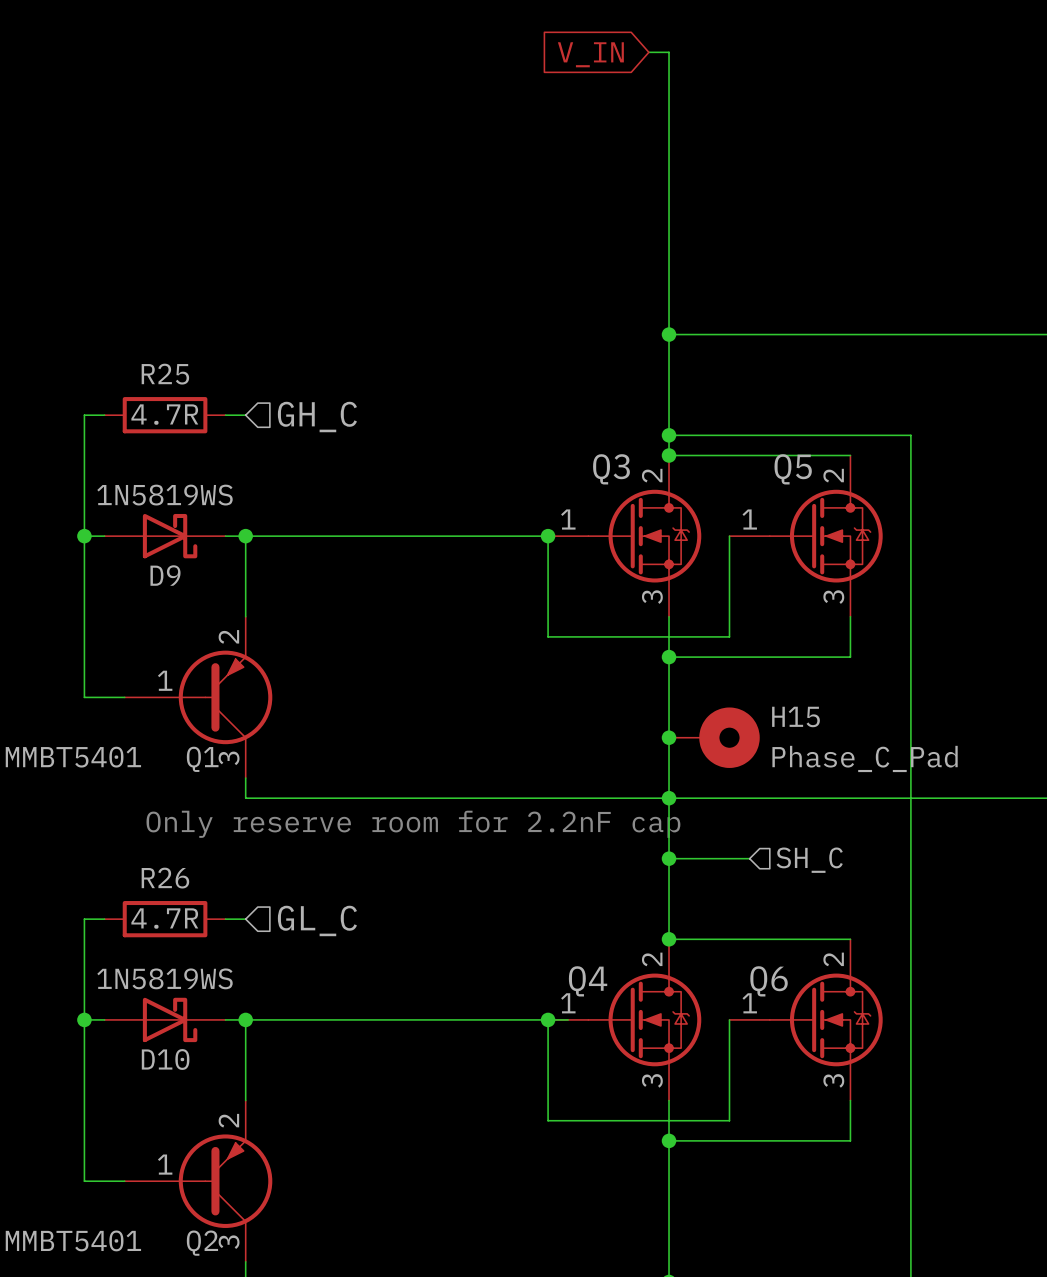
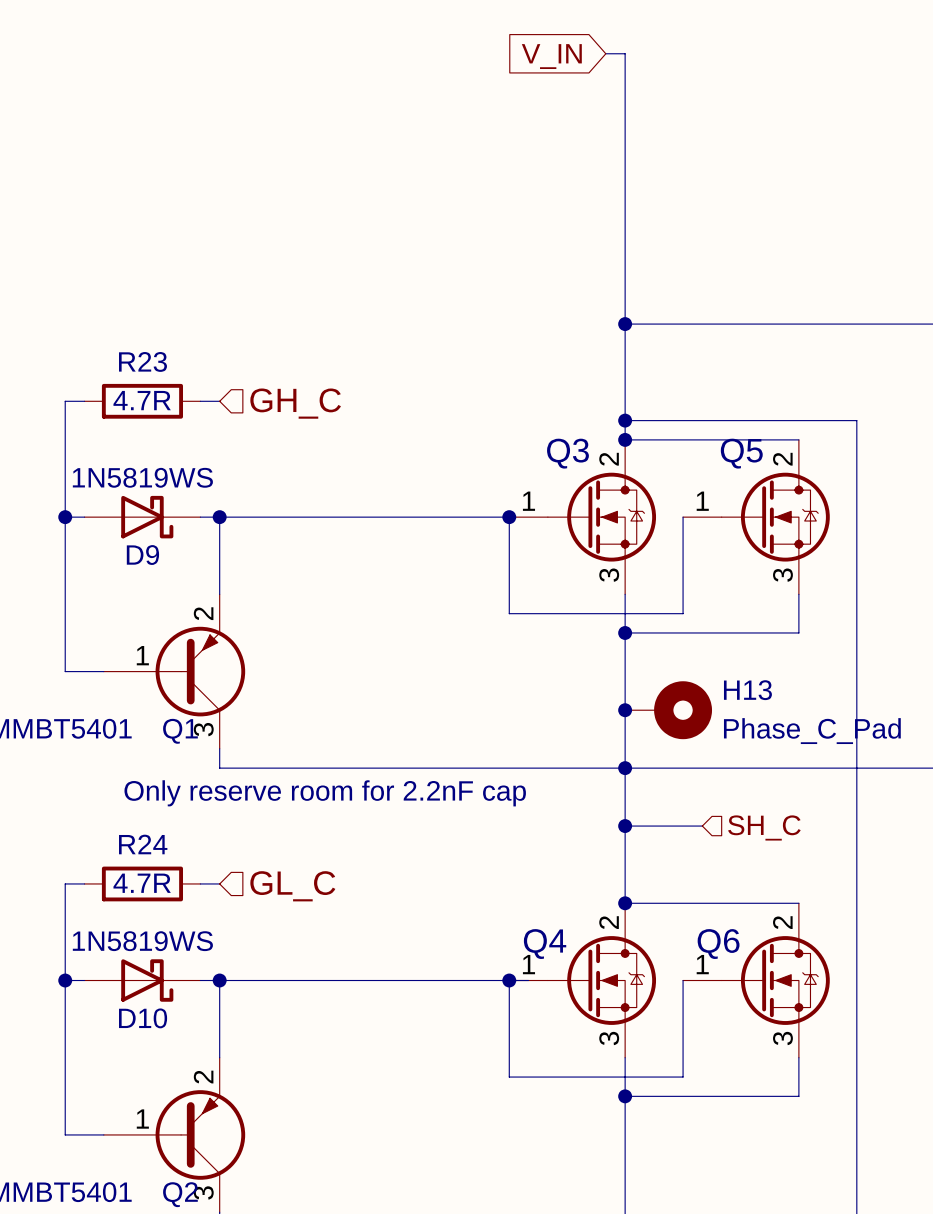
R25 name: R25 (165, 374) -> R23 (142, 361)
H15 name: H15 (795, 716) -> H13 (747, 690)
R26 name: R26 (165, 878) -> R24 (143, 844)

